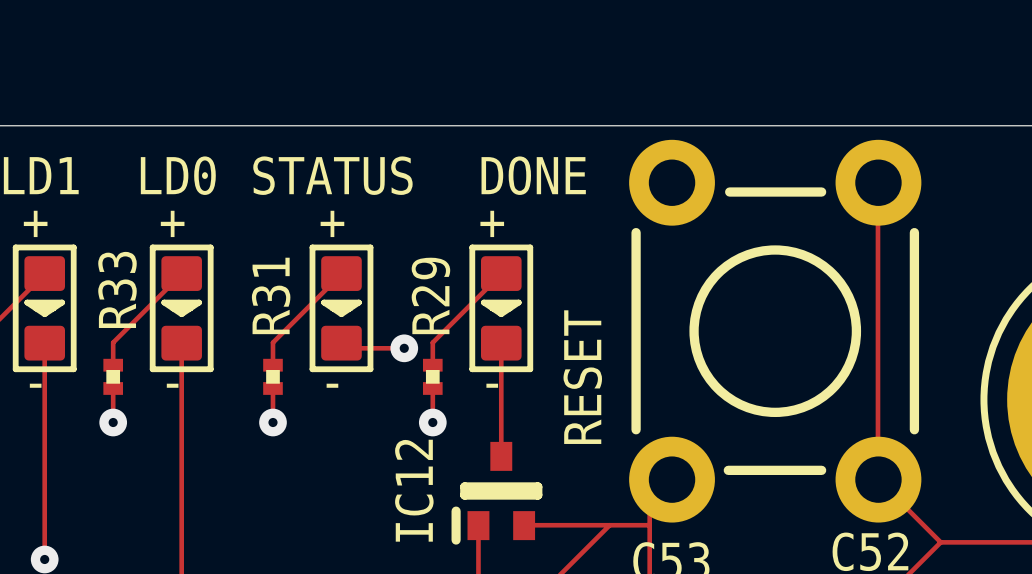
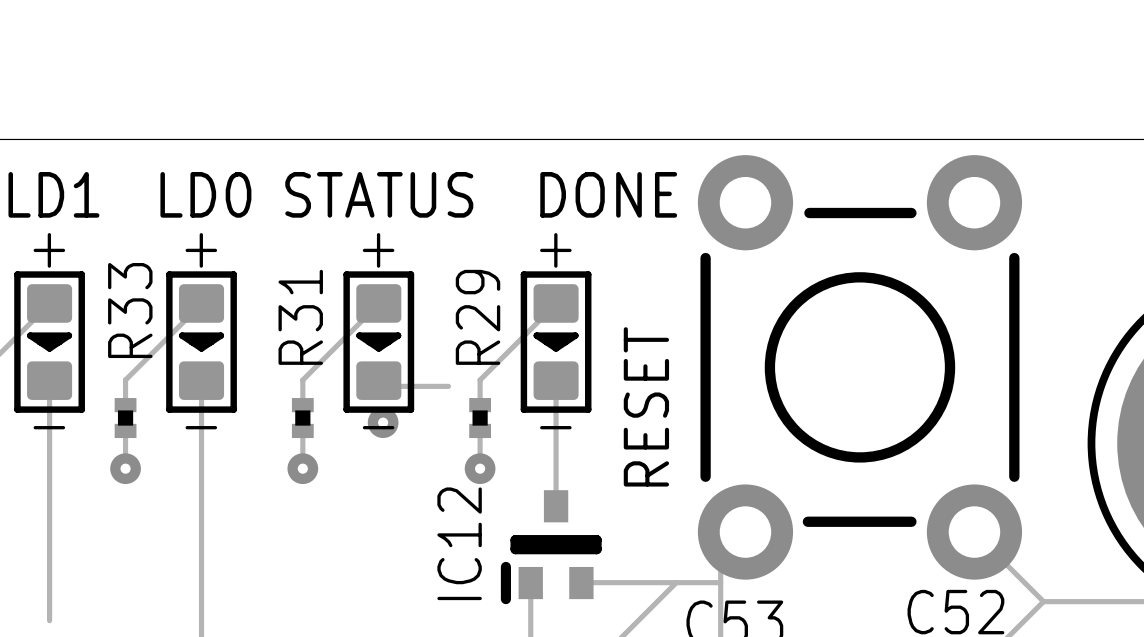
track: (877, 182) (877, 479) -> none
via position: (404, 348) -> (383, 422)
via: (44, 559) -> none

